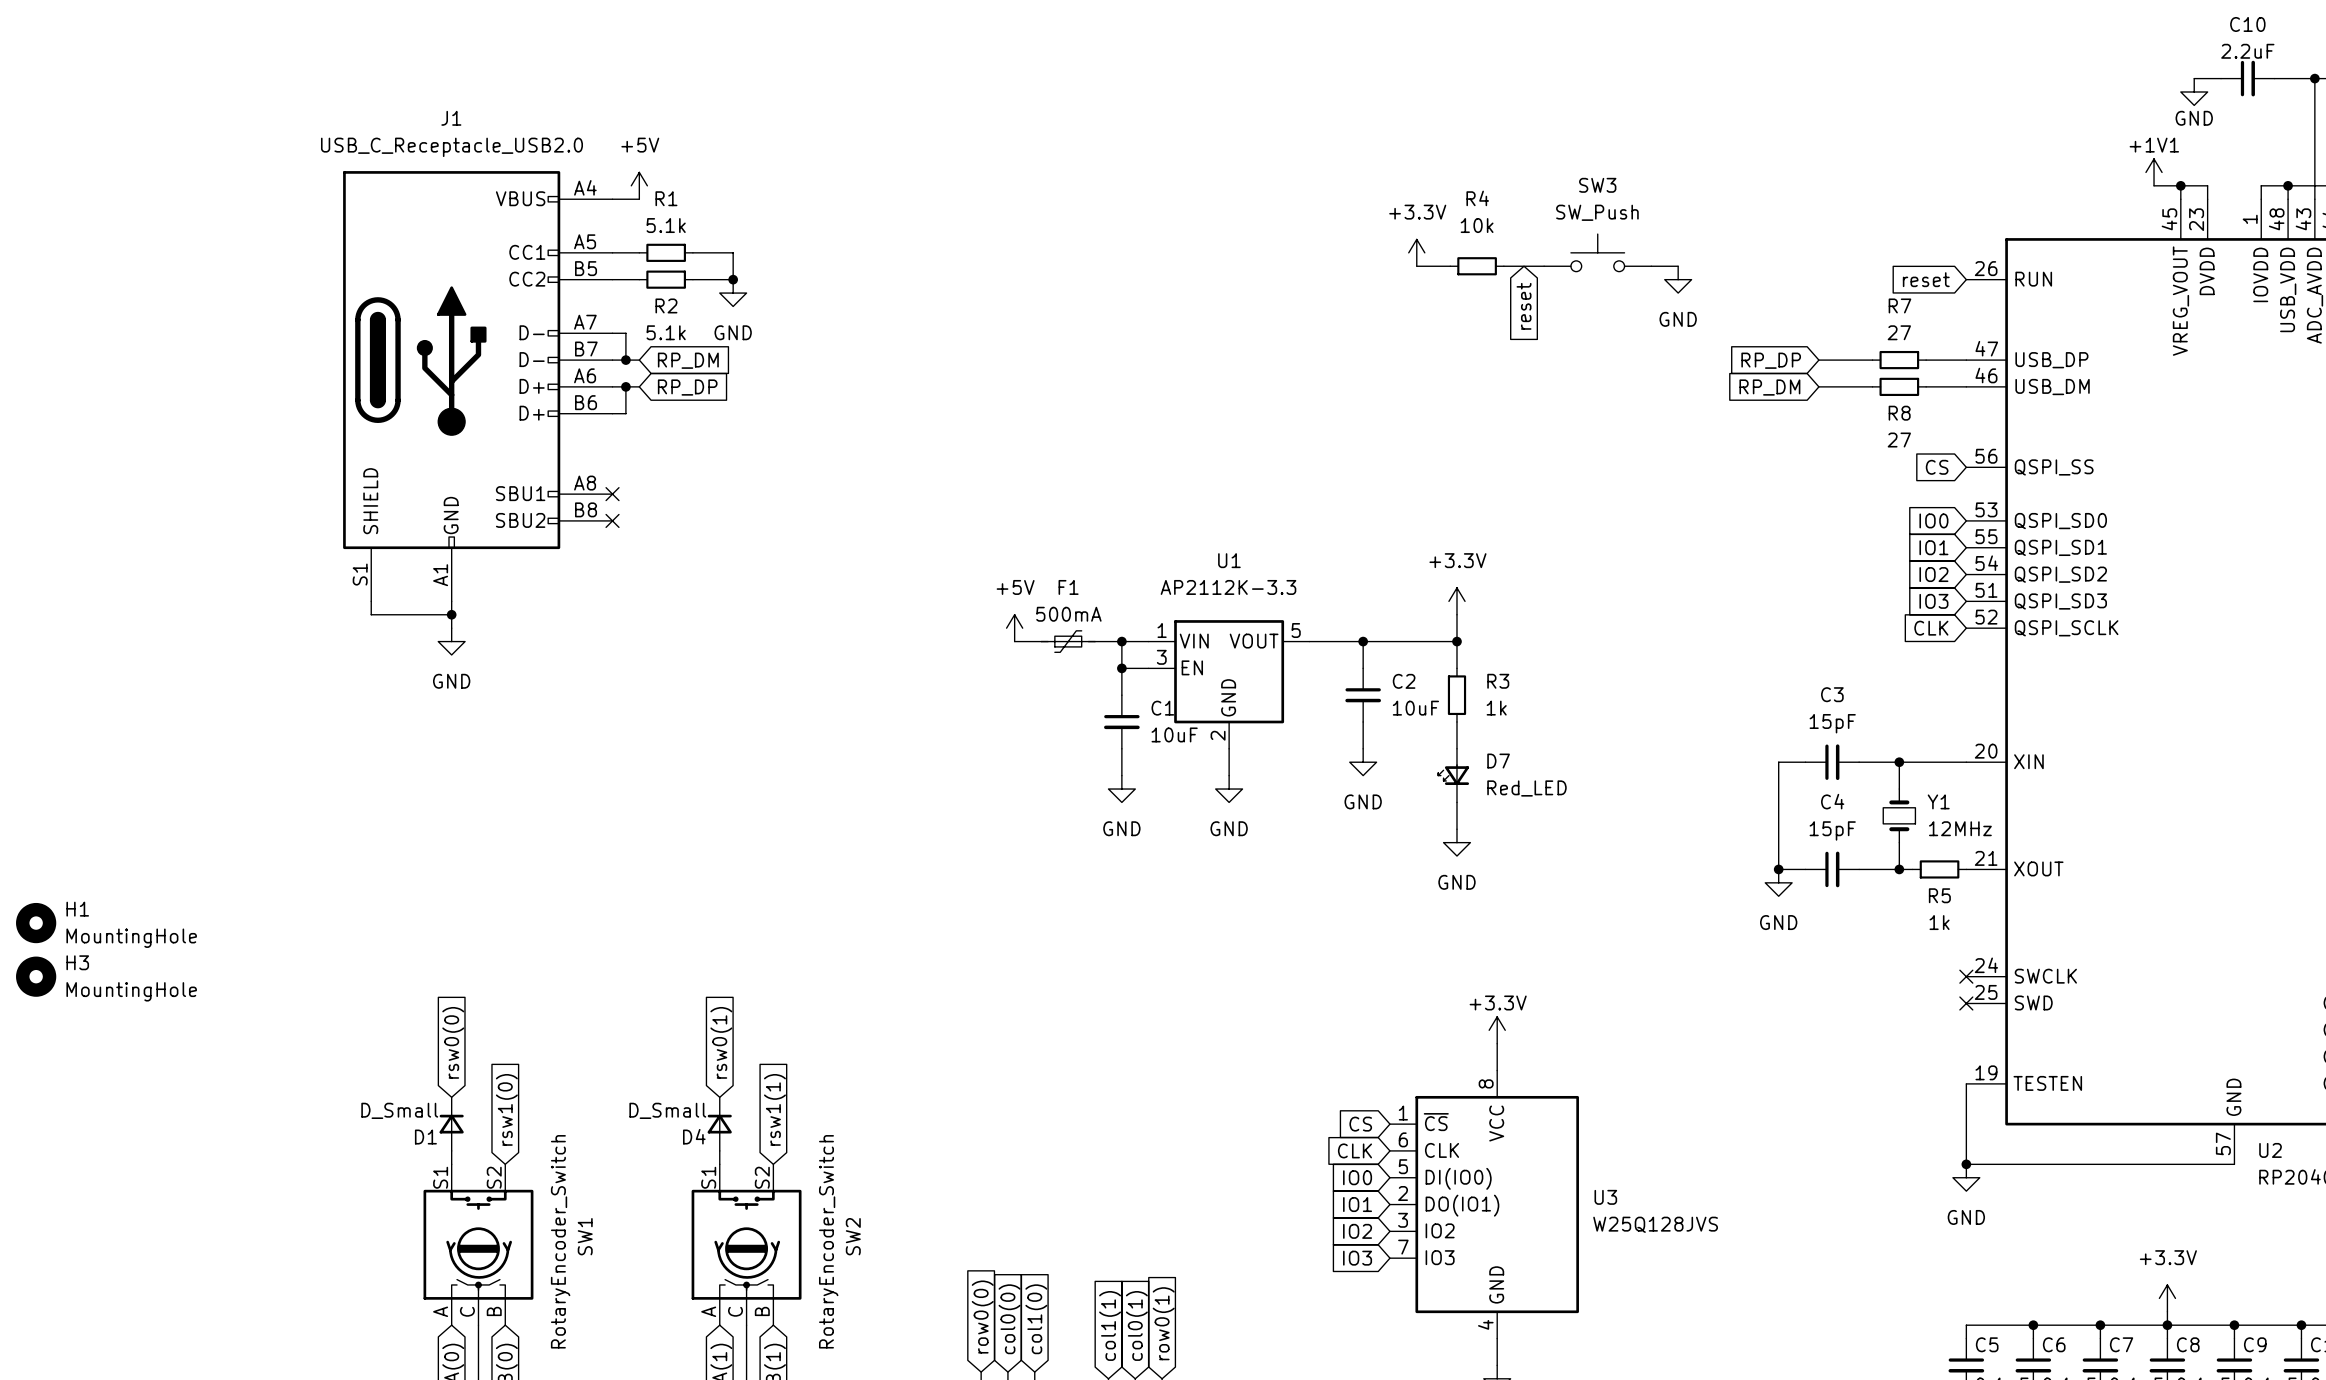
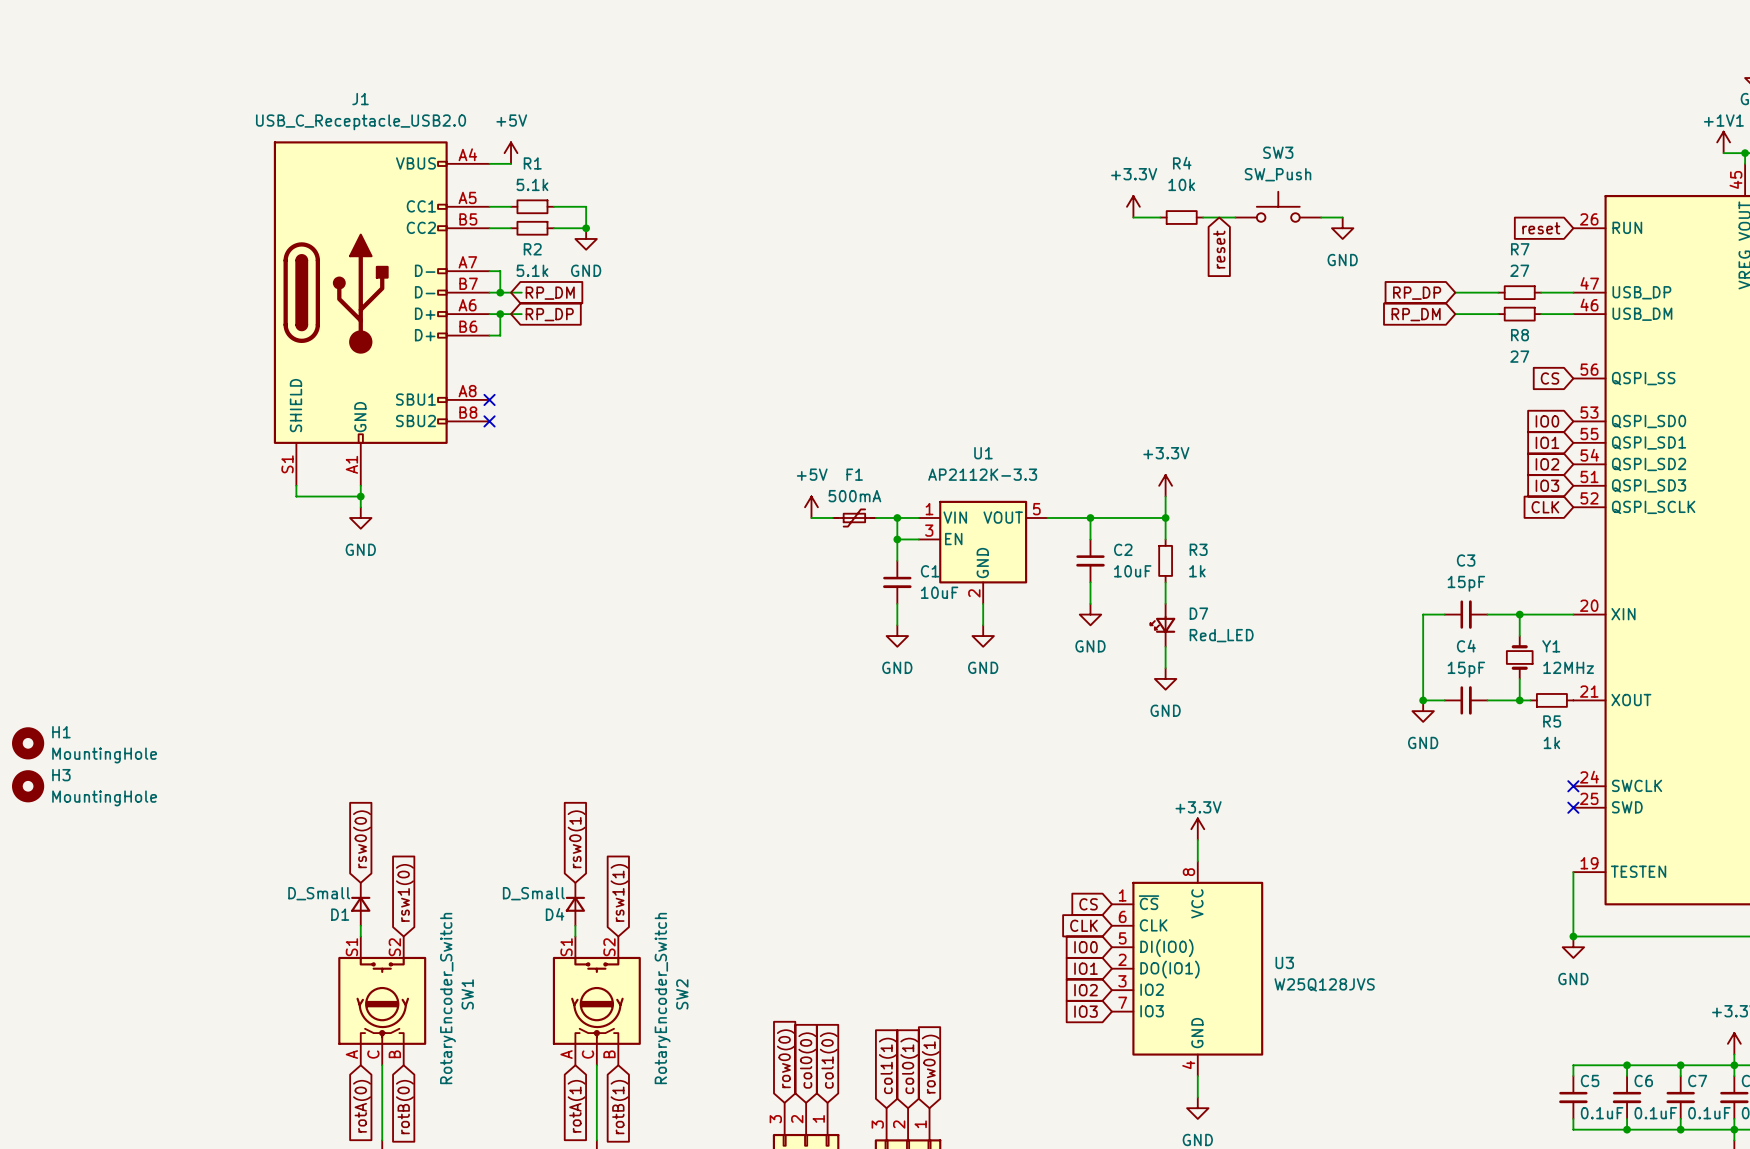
wire: none -> (511, 292) (521, 292)
wire: none -> (511, 314) (521, 314)

